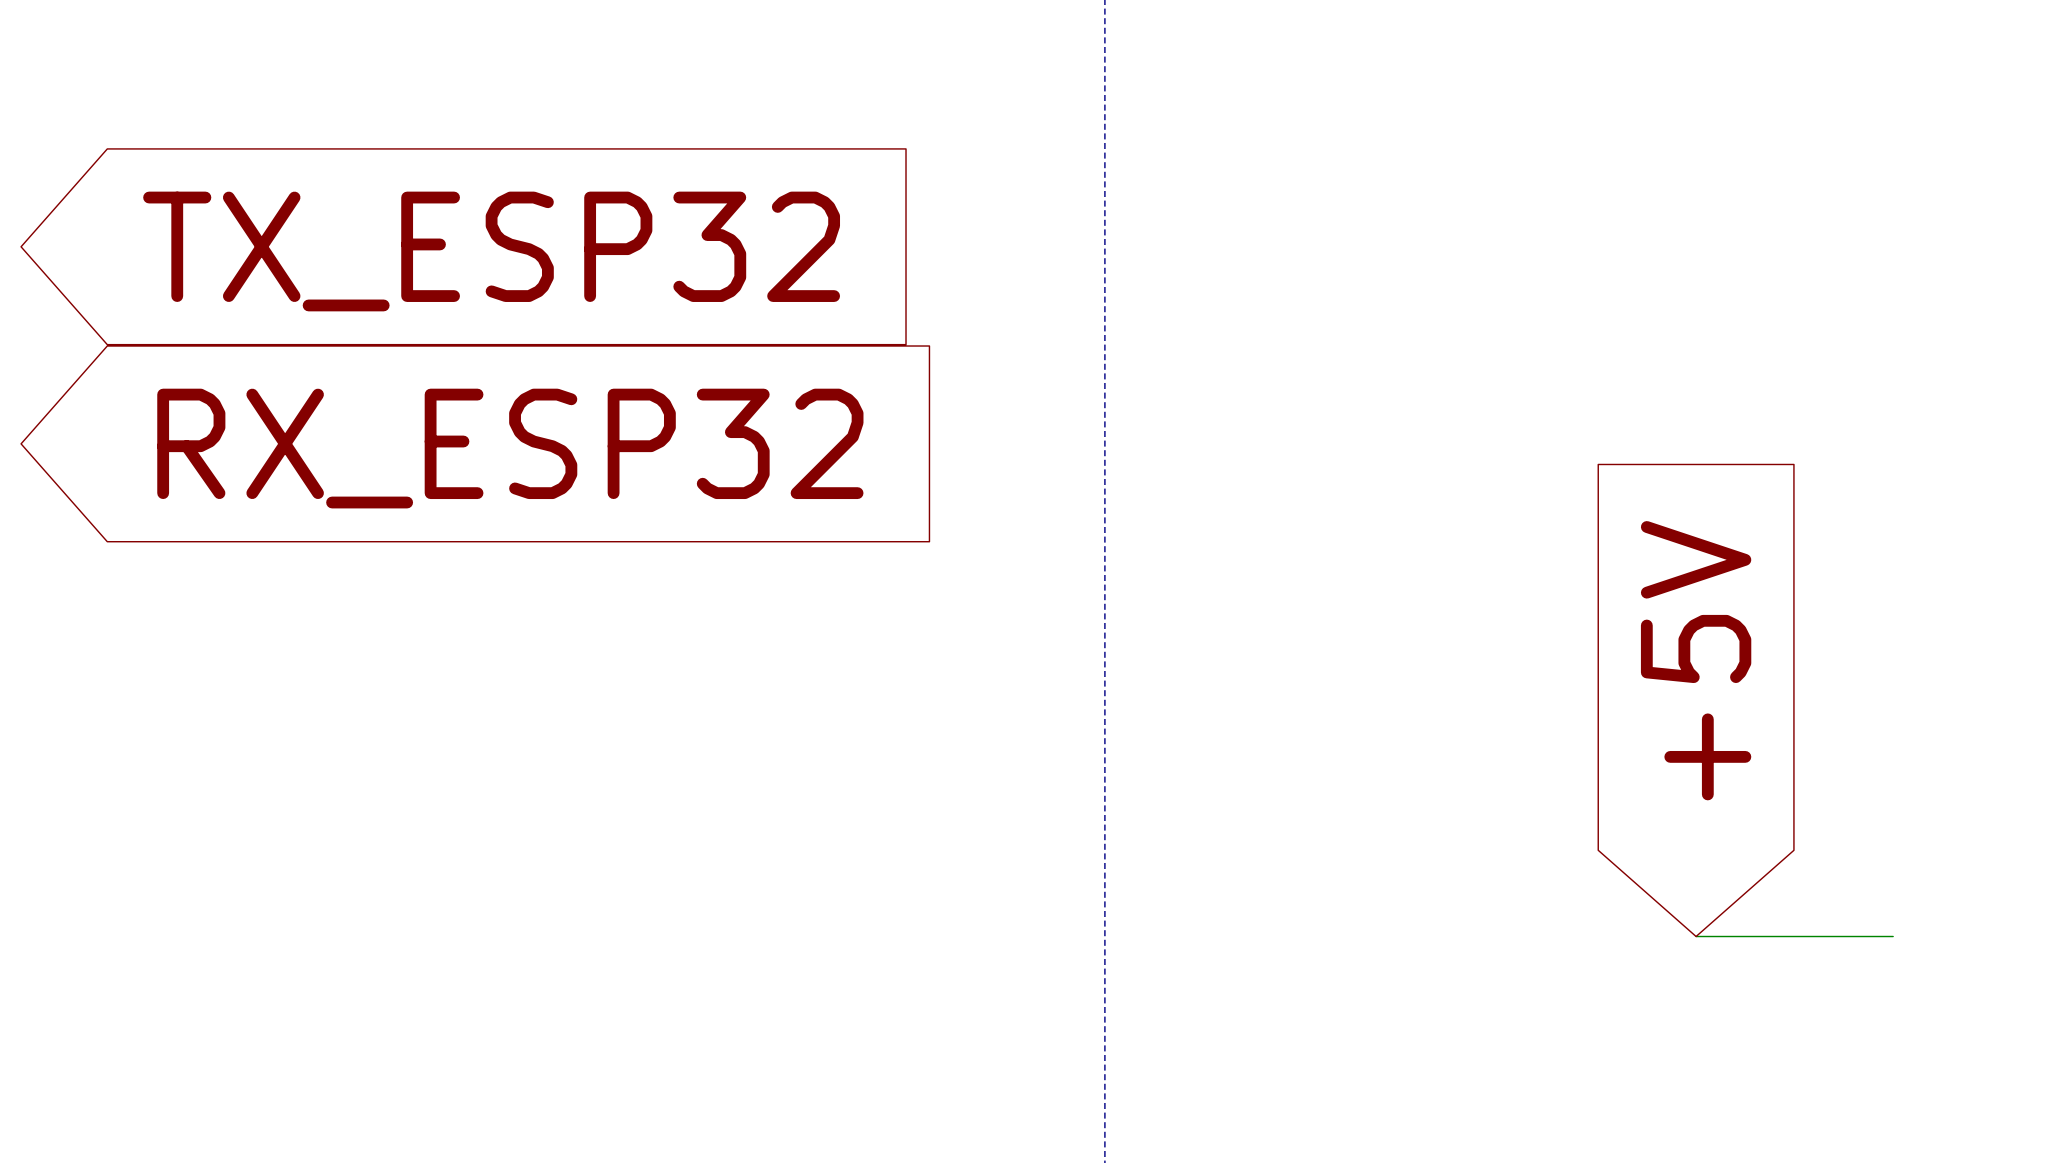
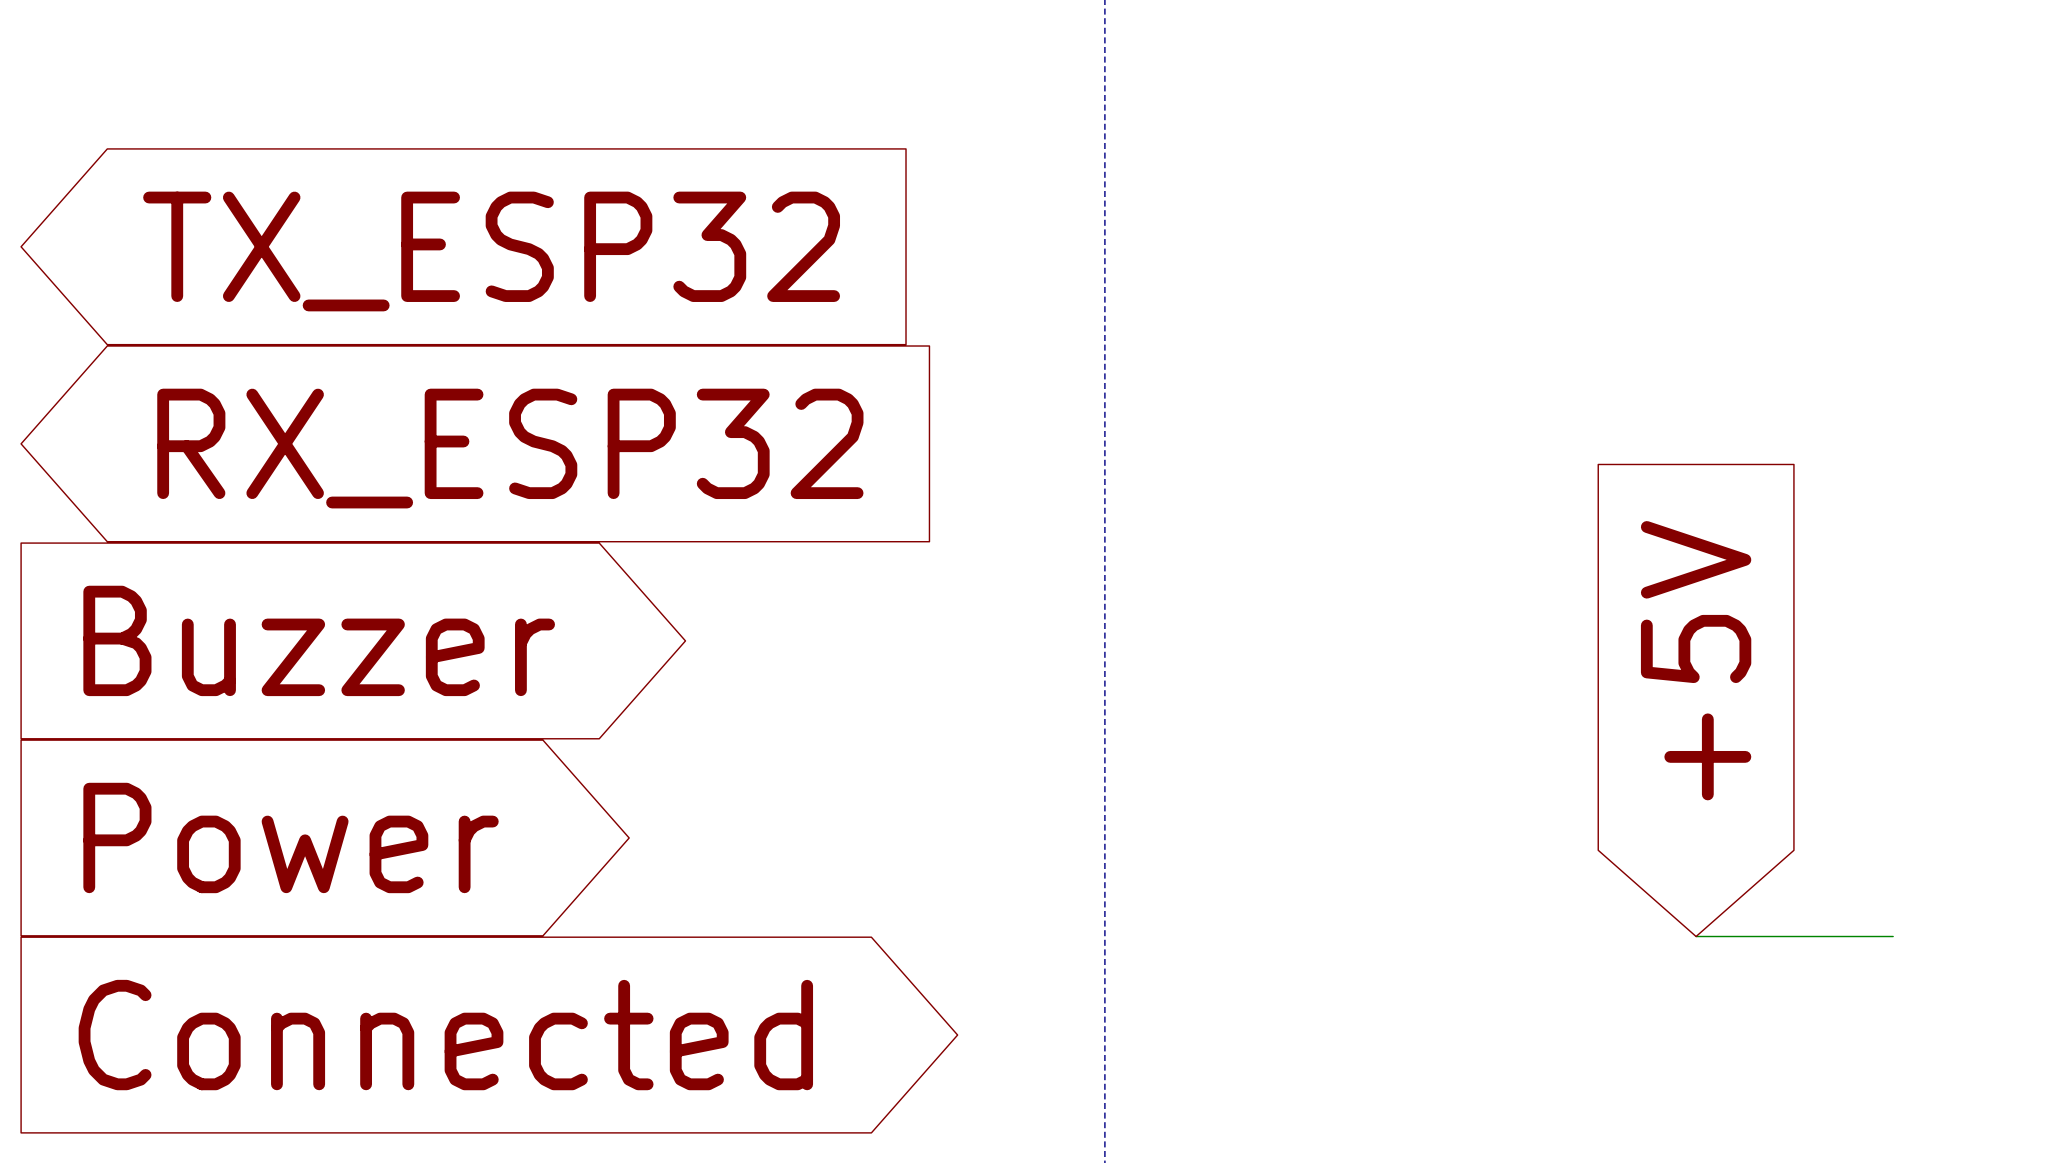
global label: none -> Buzzer (319, 640)
global label: none -> Power (291, 837)
global label: none -> Connected (445, 1035)

